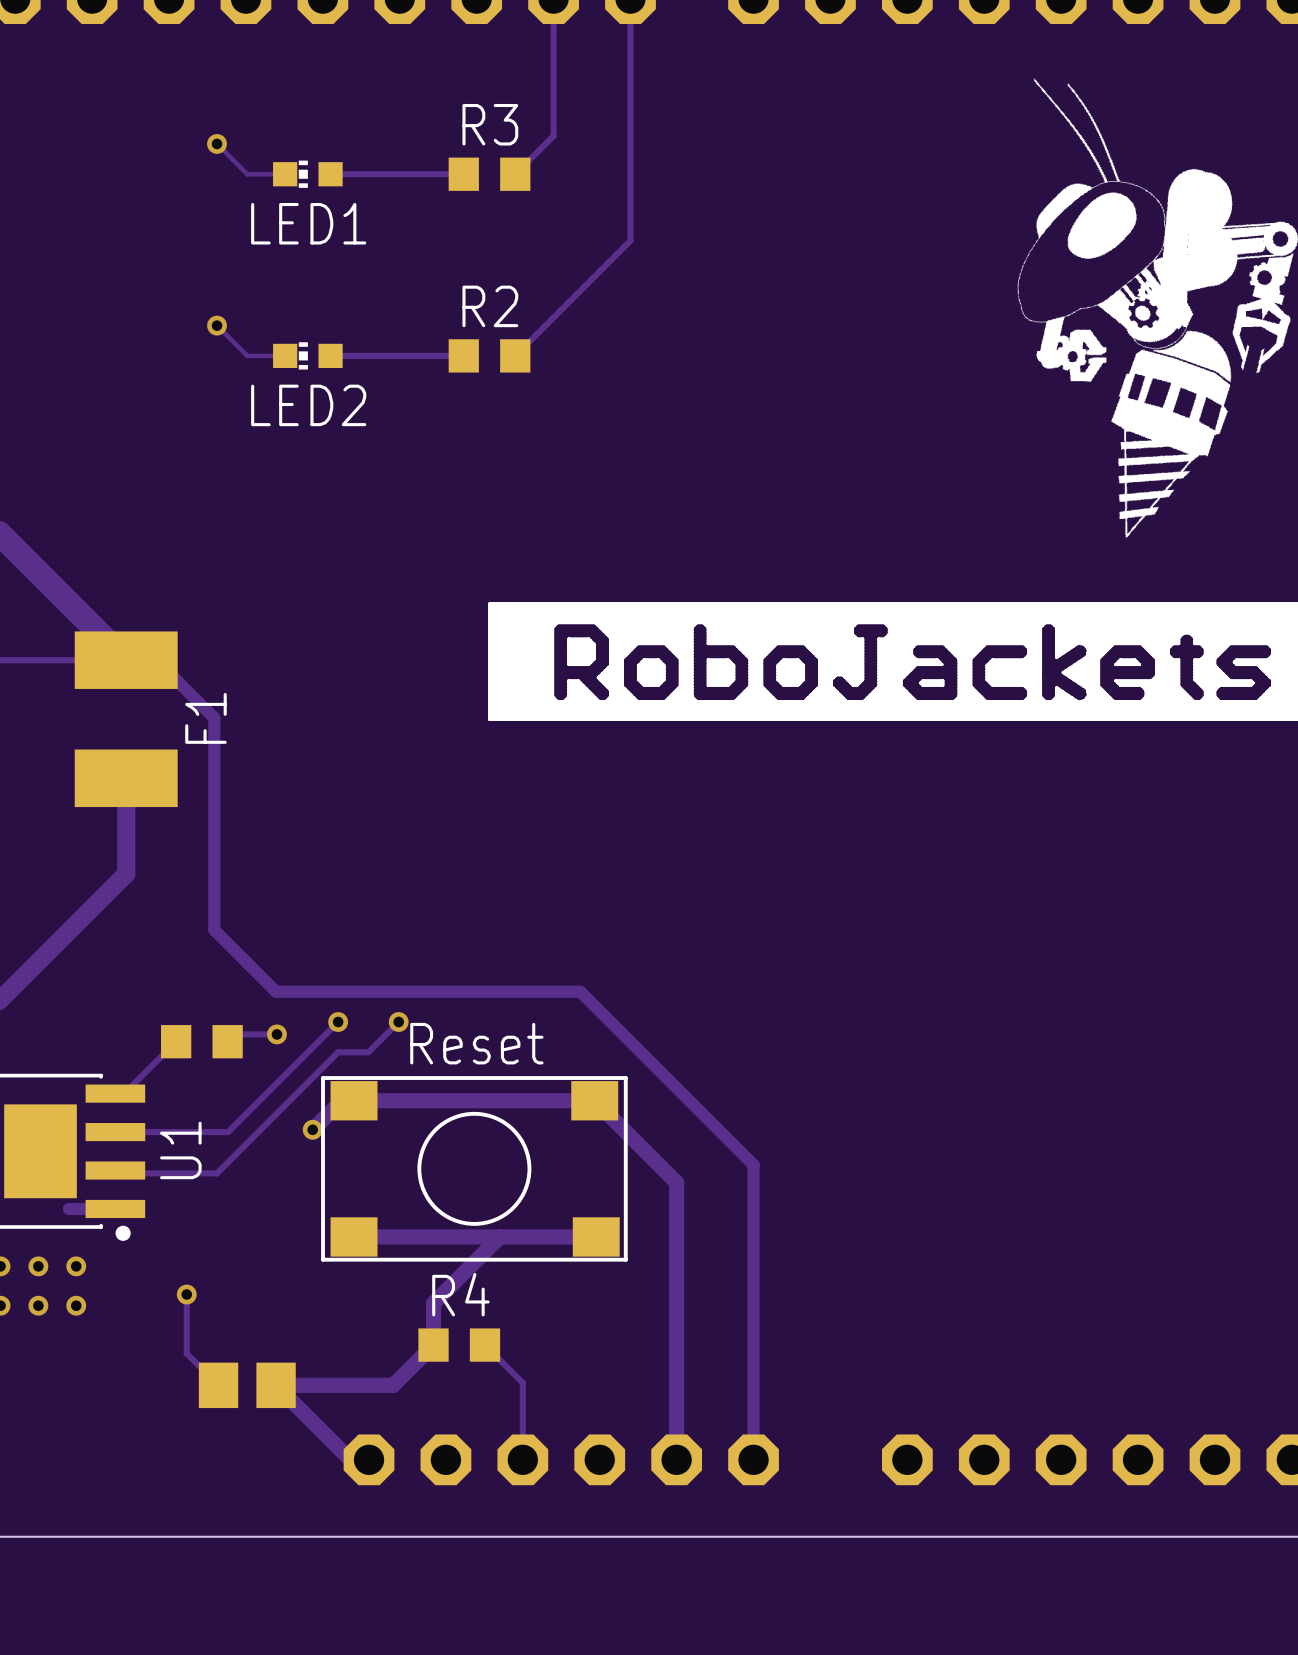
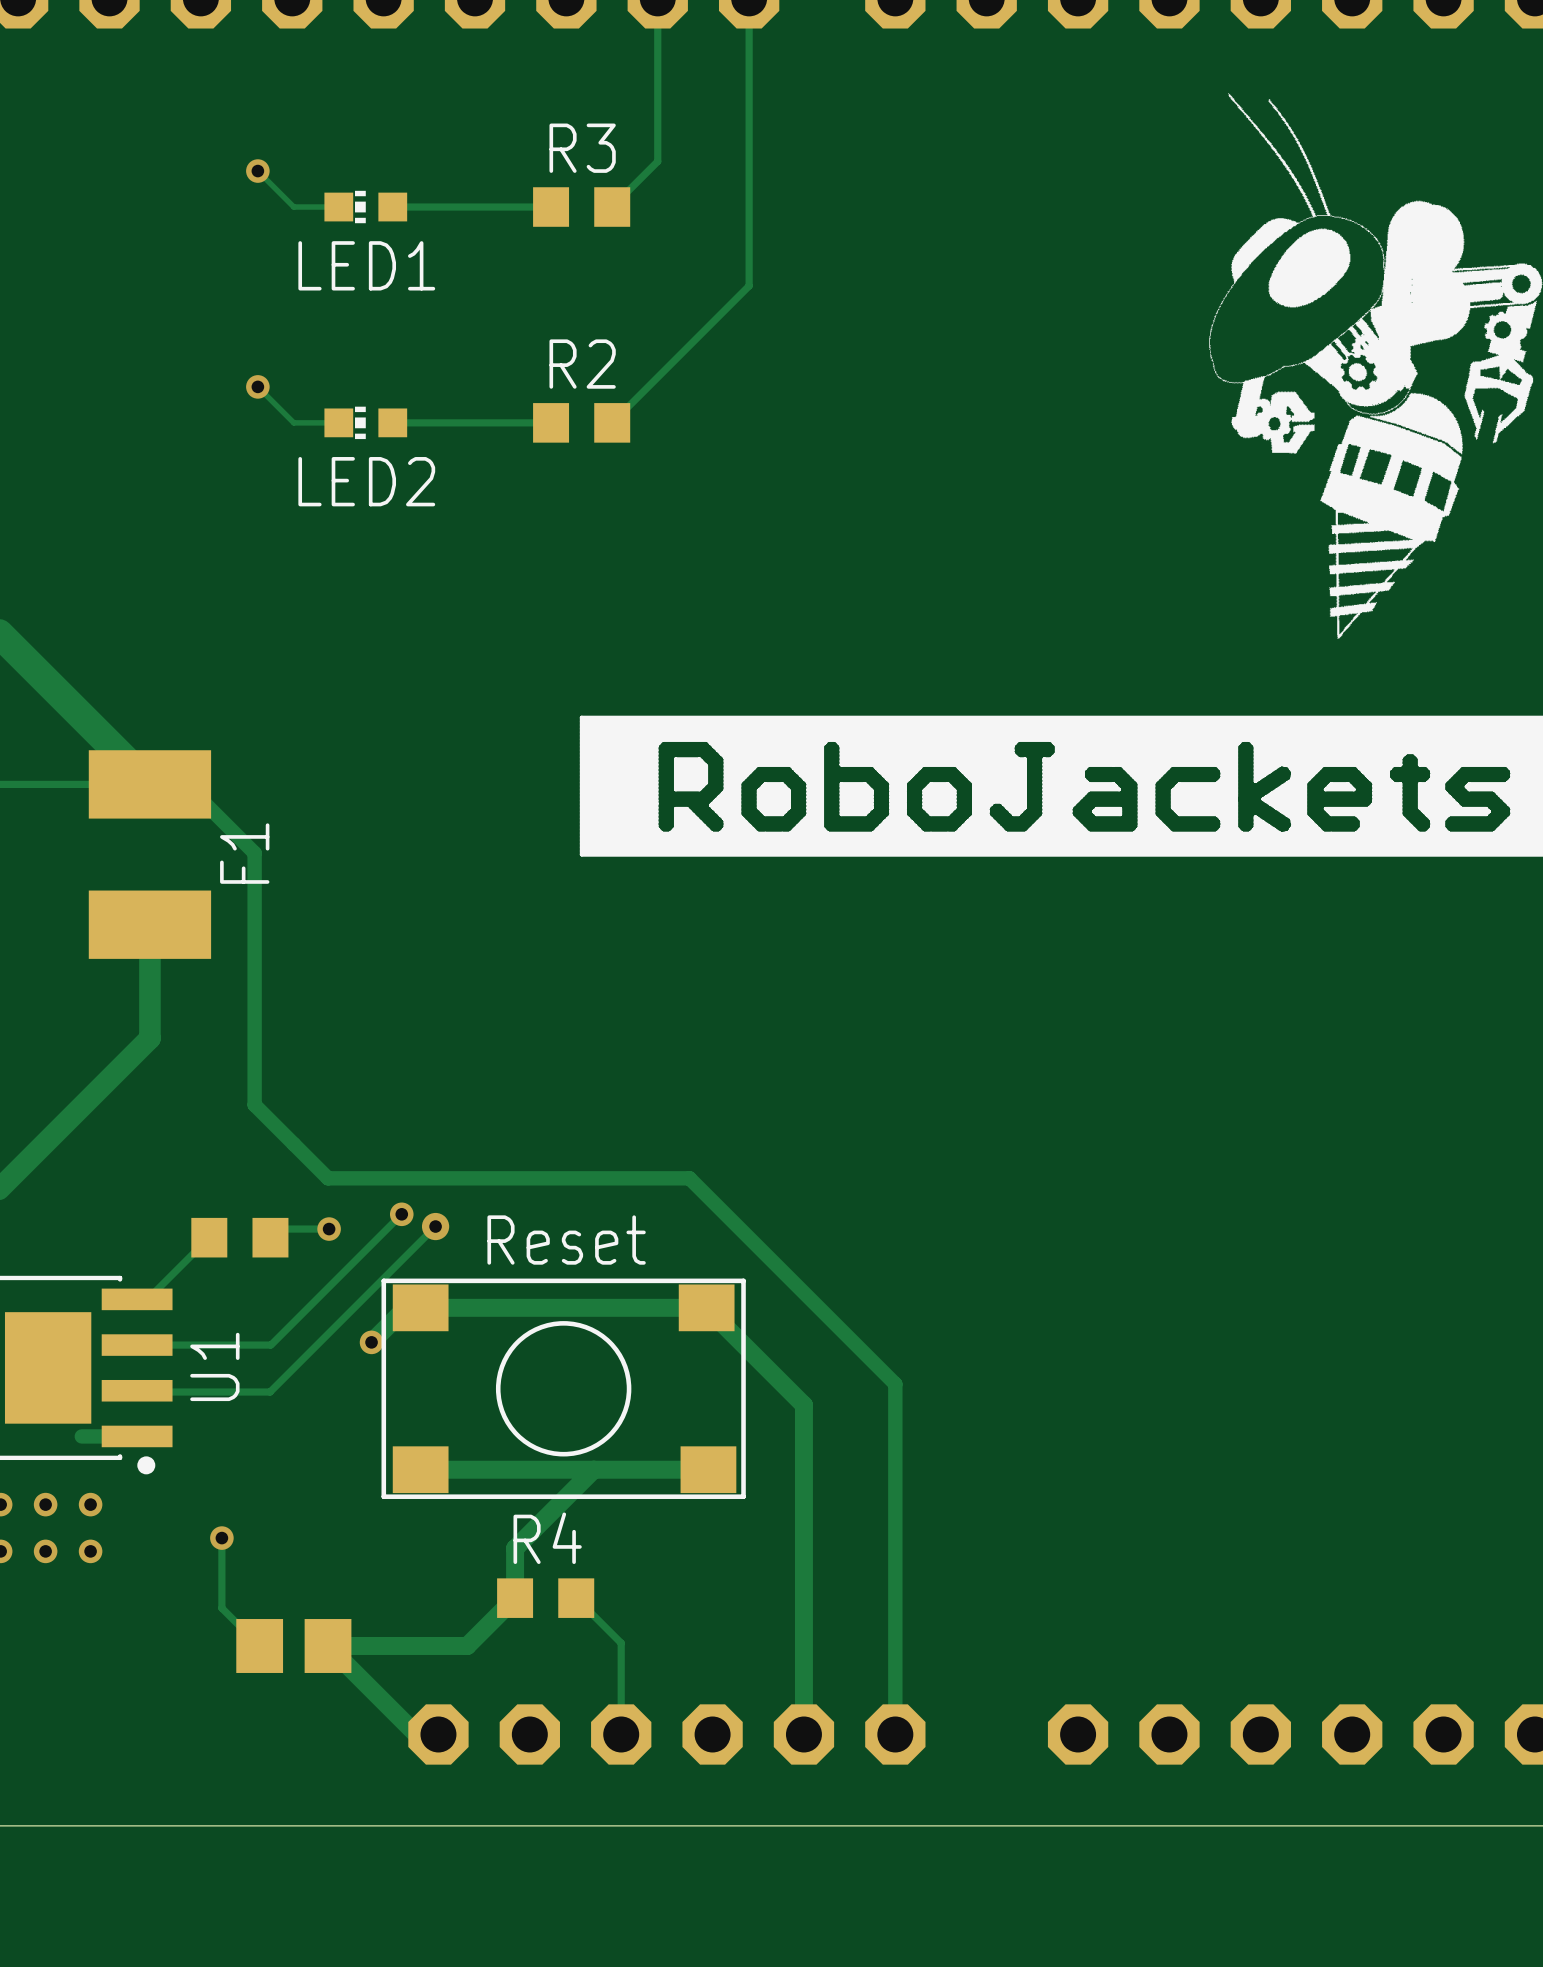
track: (398, 1022) (368, 1052) (338, 1052) (217, 1173) (118, 1173) (116, 1171) -> (435, 1226) (270, 1392) (138, 1392)
via: (398, 1022) -> none
via: none -> (435, 1226)

